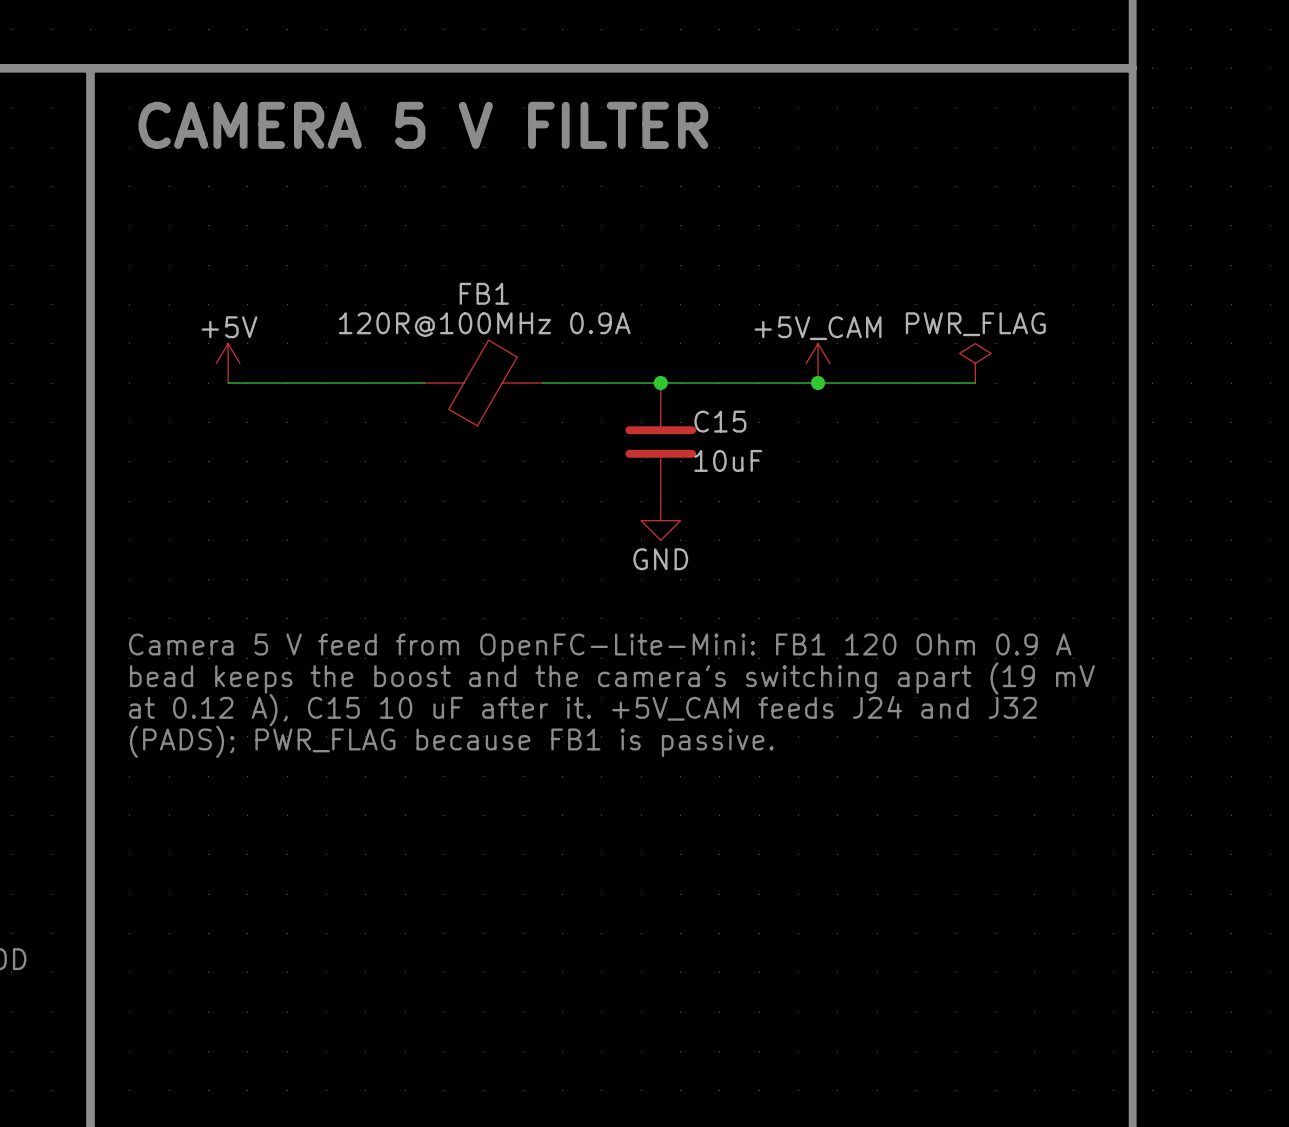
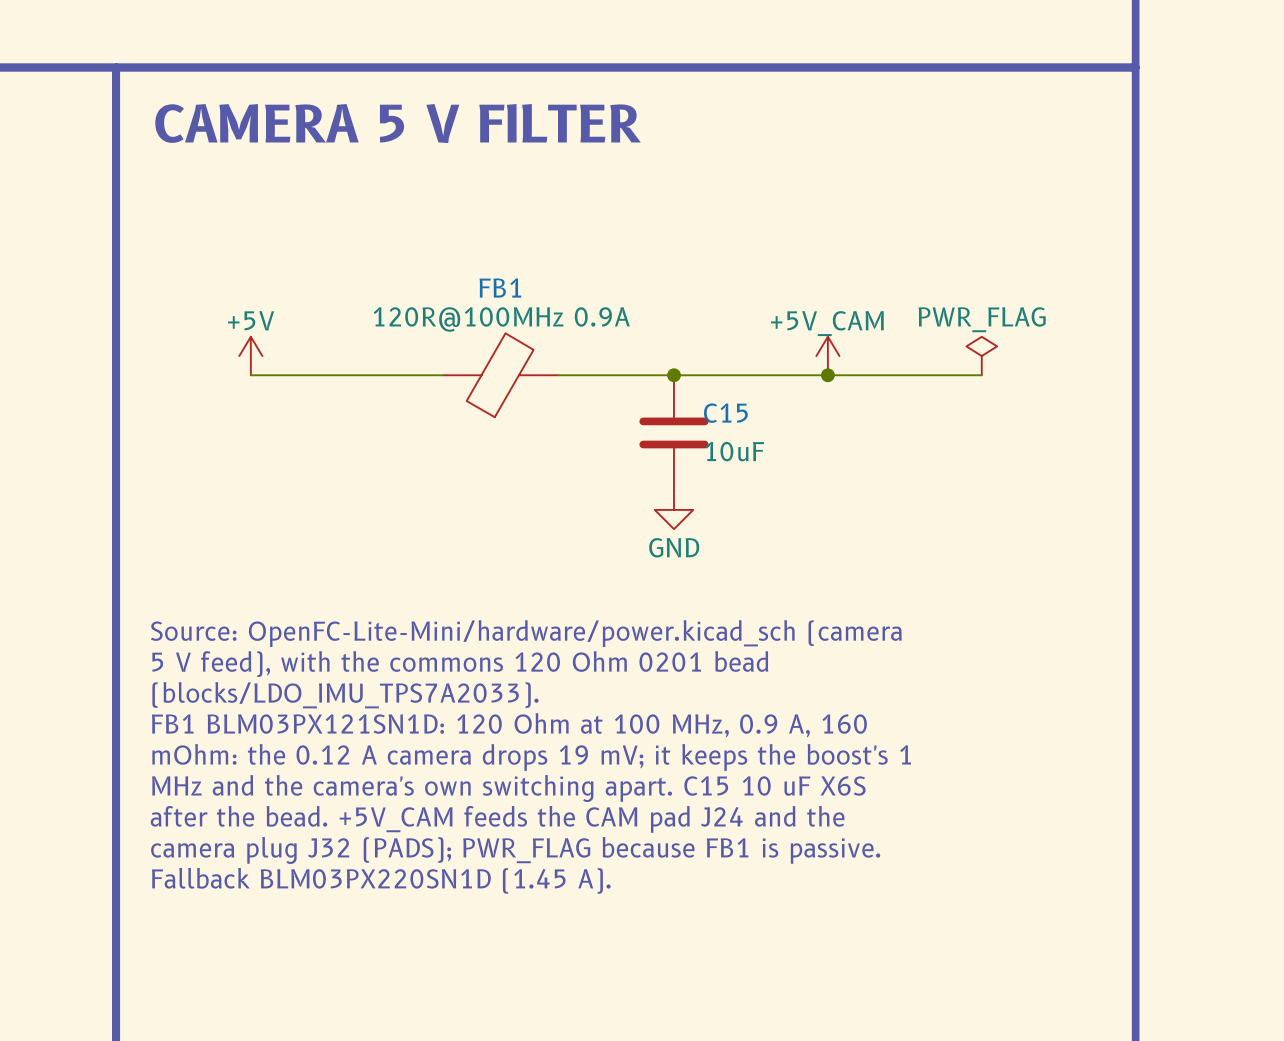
text: Camera 5 V feed from OpenFC-Lite-Mini: FB1 120 Ohm 0.9 A (600, 647) -> Source: OpenFC-Lite-Mini/hardware/power.kicad_sch (camera (526, 633)
text: bead keeps the boost and the camera's switching apart (19 mV (612, 678) -> 5 V feed), with the commons 120 Ohm 0201 bead (460, 664)
text: at 0.12 A), C15 10 uF after it. +5V_CAM feeds J24 and J32 (582, 710) -> (blocks/LDO_IMU_TPS7A2033). (345, 695)
text: (PADS); PWR_FLAG because FB1 is passive. (451, 741) -> FB1 BLM03PX121SN1D: 120 Ohm at 100 MHz, 0.9 A, 160 (509, 725)
text: none -> mOhm: the 0.12 A camera drops 19 mV; it keeps the boost's 1 (531, 757)
text: none -> MHz and the camera's own switching apart. C15 10 uF X6S (508, 788)
text: none -> after the bead. +5V_CAM feeds the CAM pad J24 and the (497, 819)
text: none -> camera plug J32 (PADS); PWR_FLAG because FB1 is passive. (515, 850)
text: none -> Fallback BLM03PX220SN1D (1.45 A). (381, 880)

